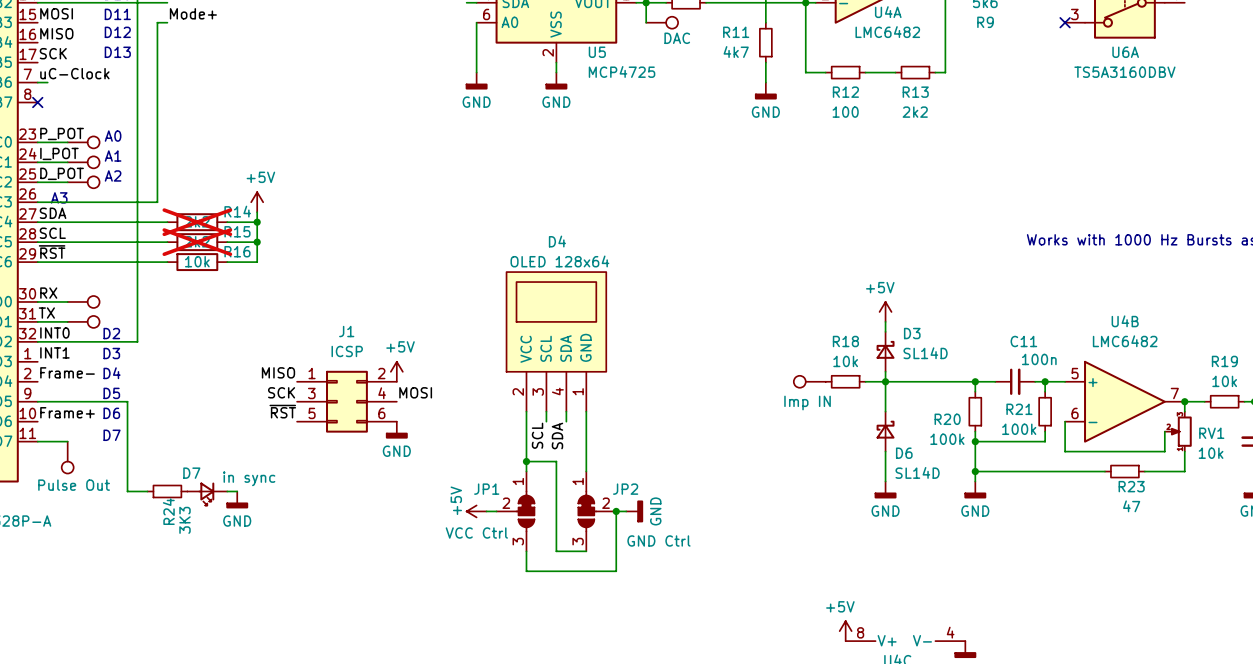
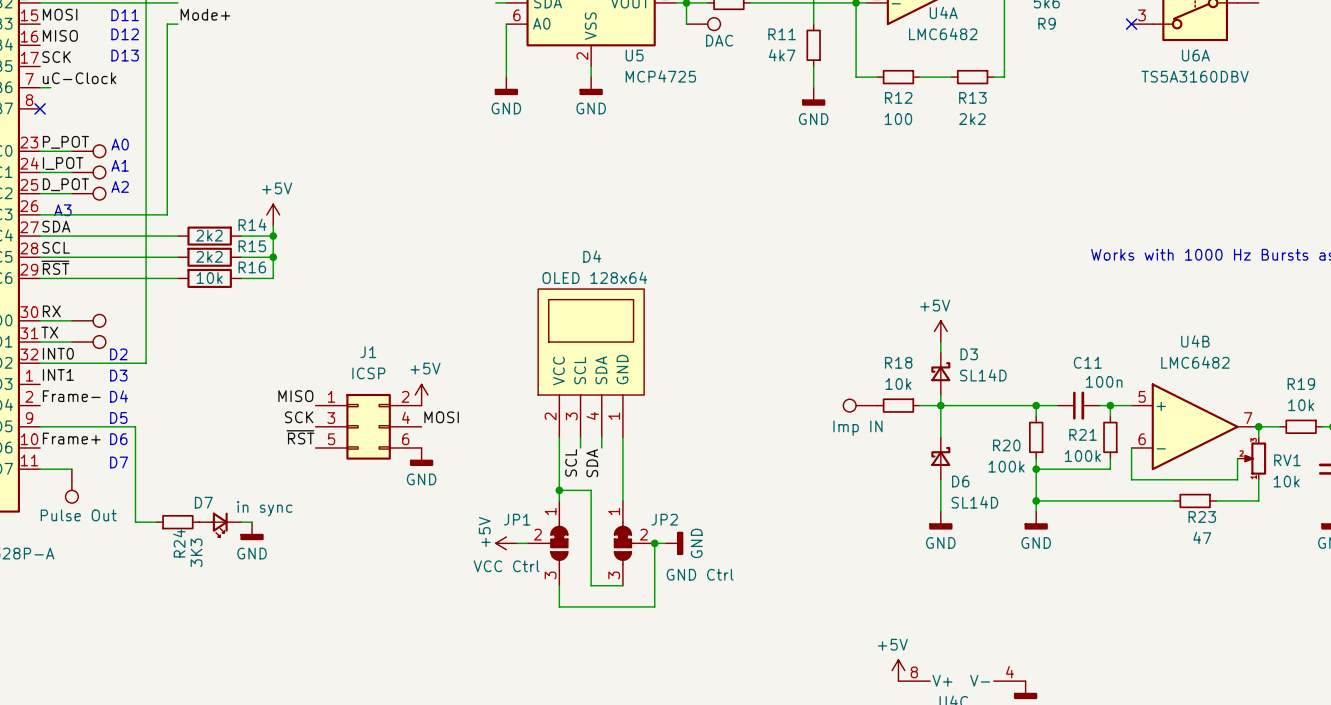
R14 do-not-place cross: (197, 222) -> none
R15 do-not-place cross: (197, 242) -> none

